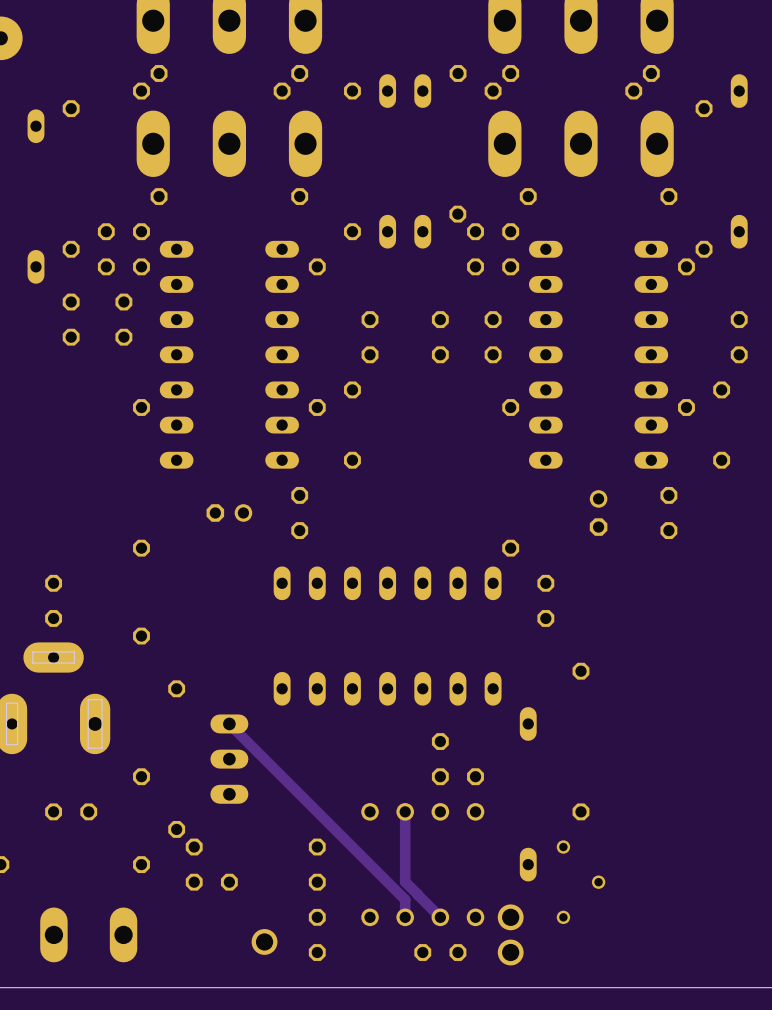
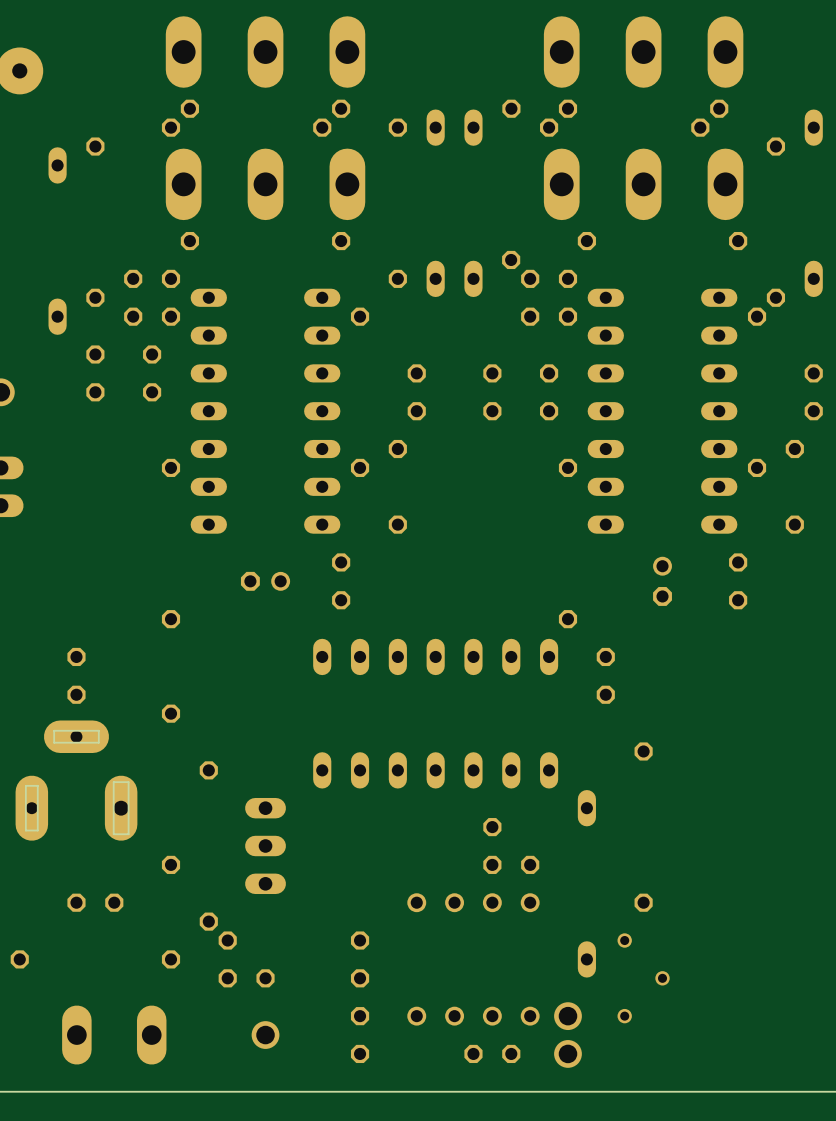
track: (229, 723) (405, 899) (405, 917) -> none
track: (405, 811) (405, 881) (440, 917) -> none
part position: (264, 941) -> (265, 1035)

